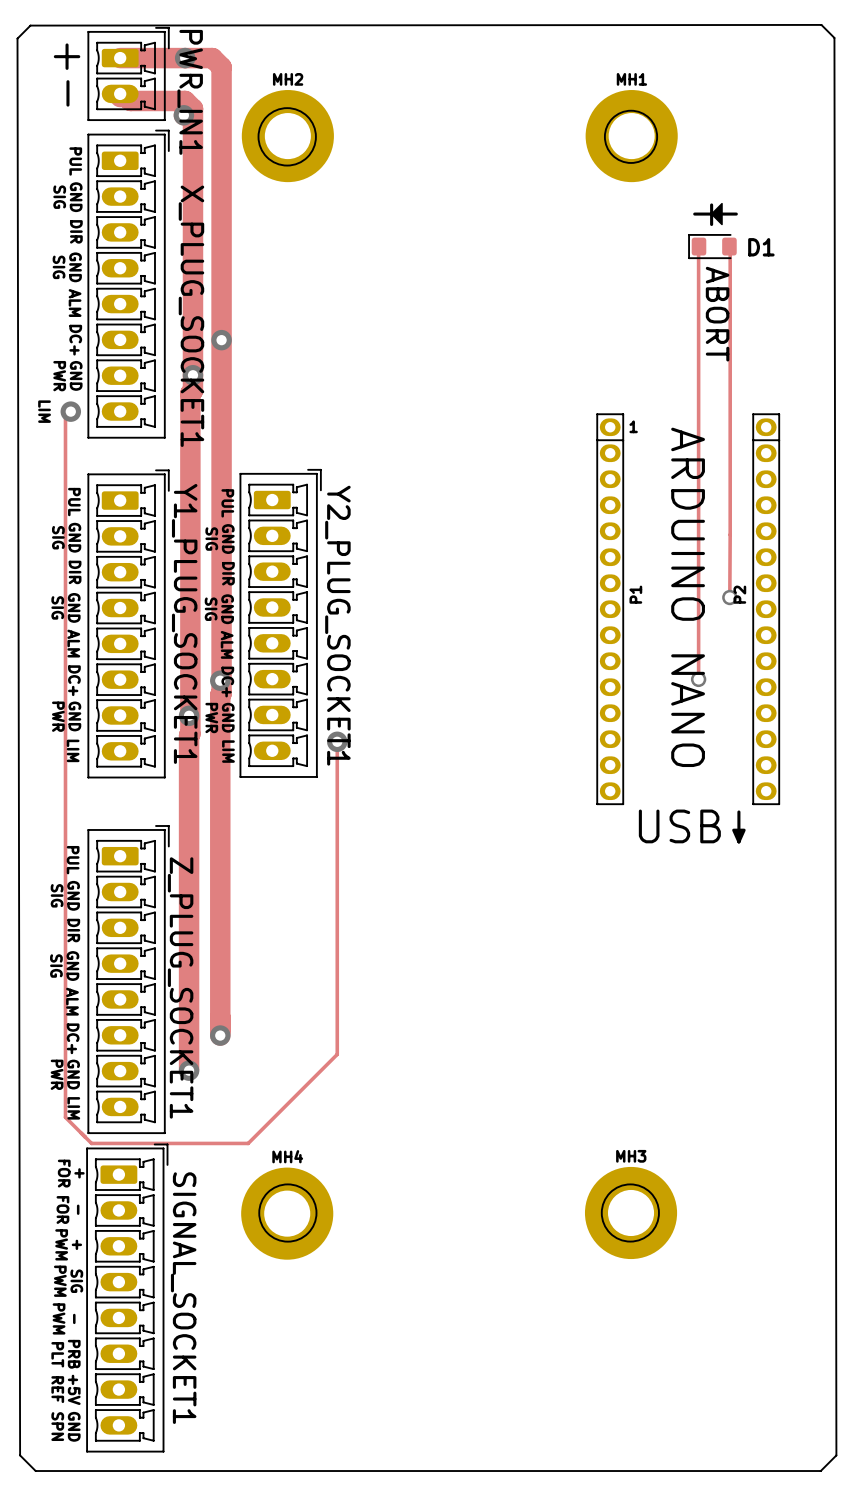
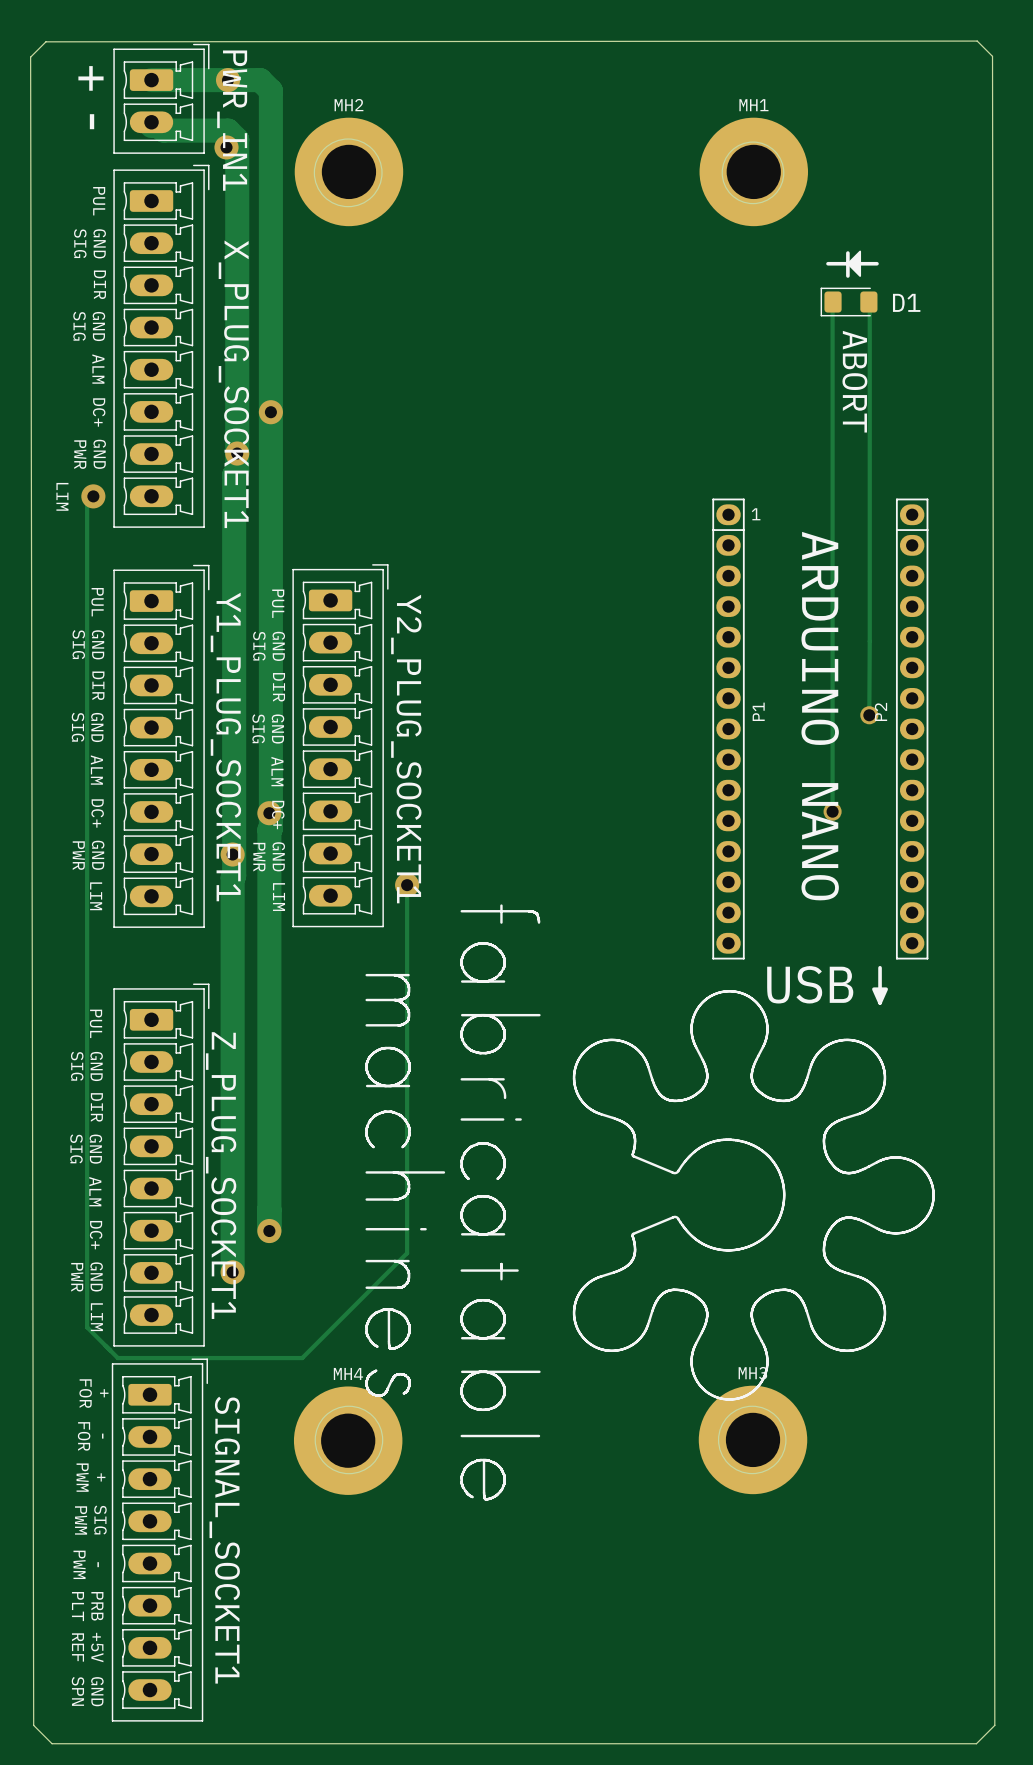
drawing: none -> [365, 904, 935, 1501]

